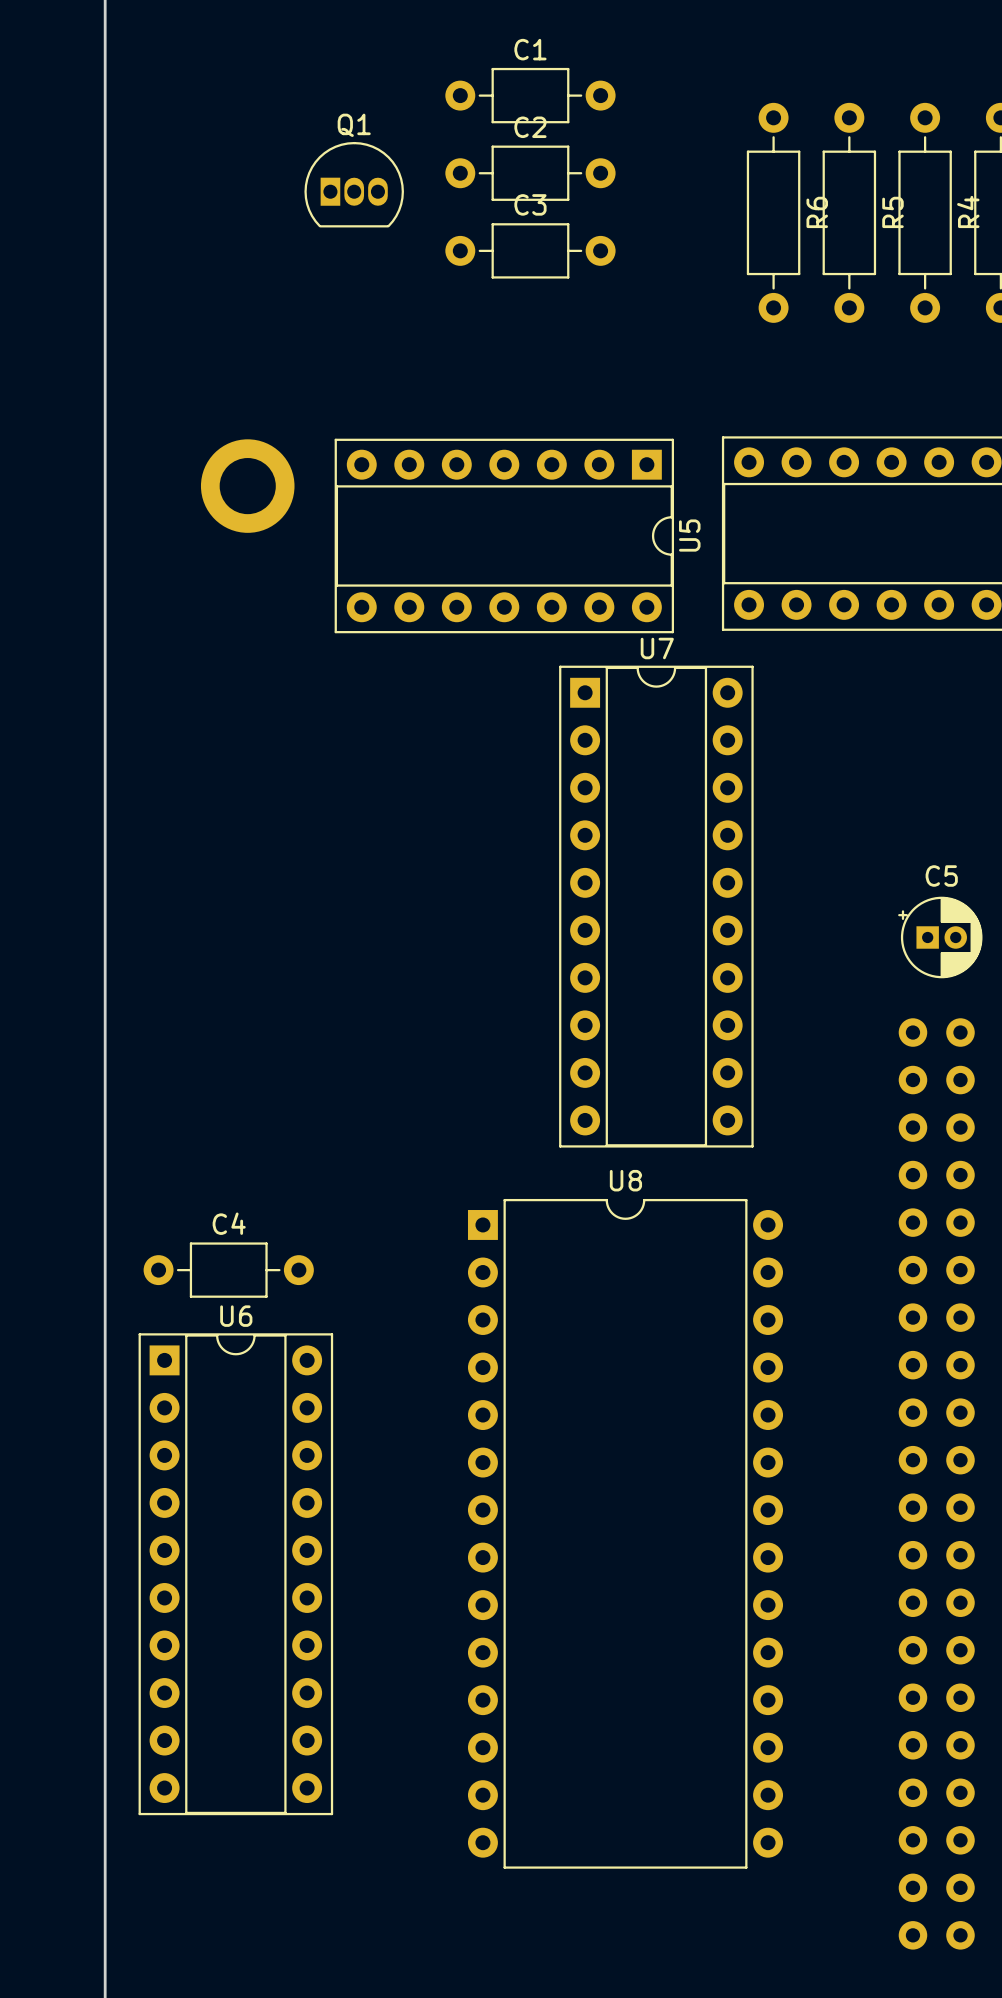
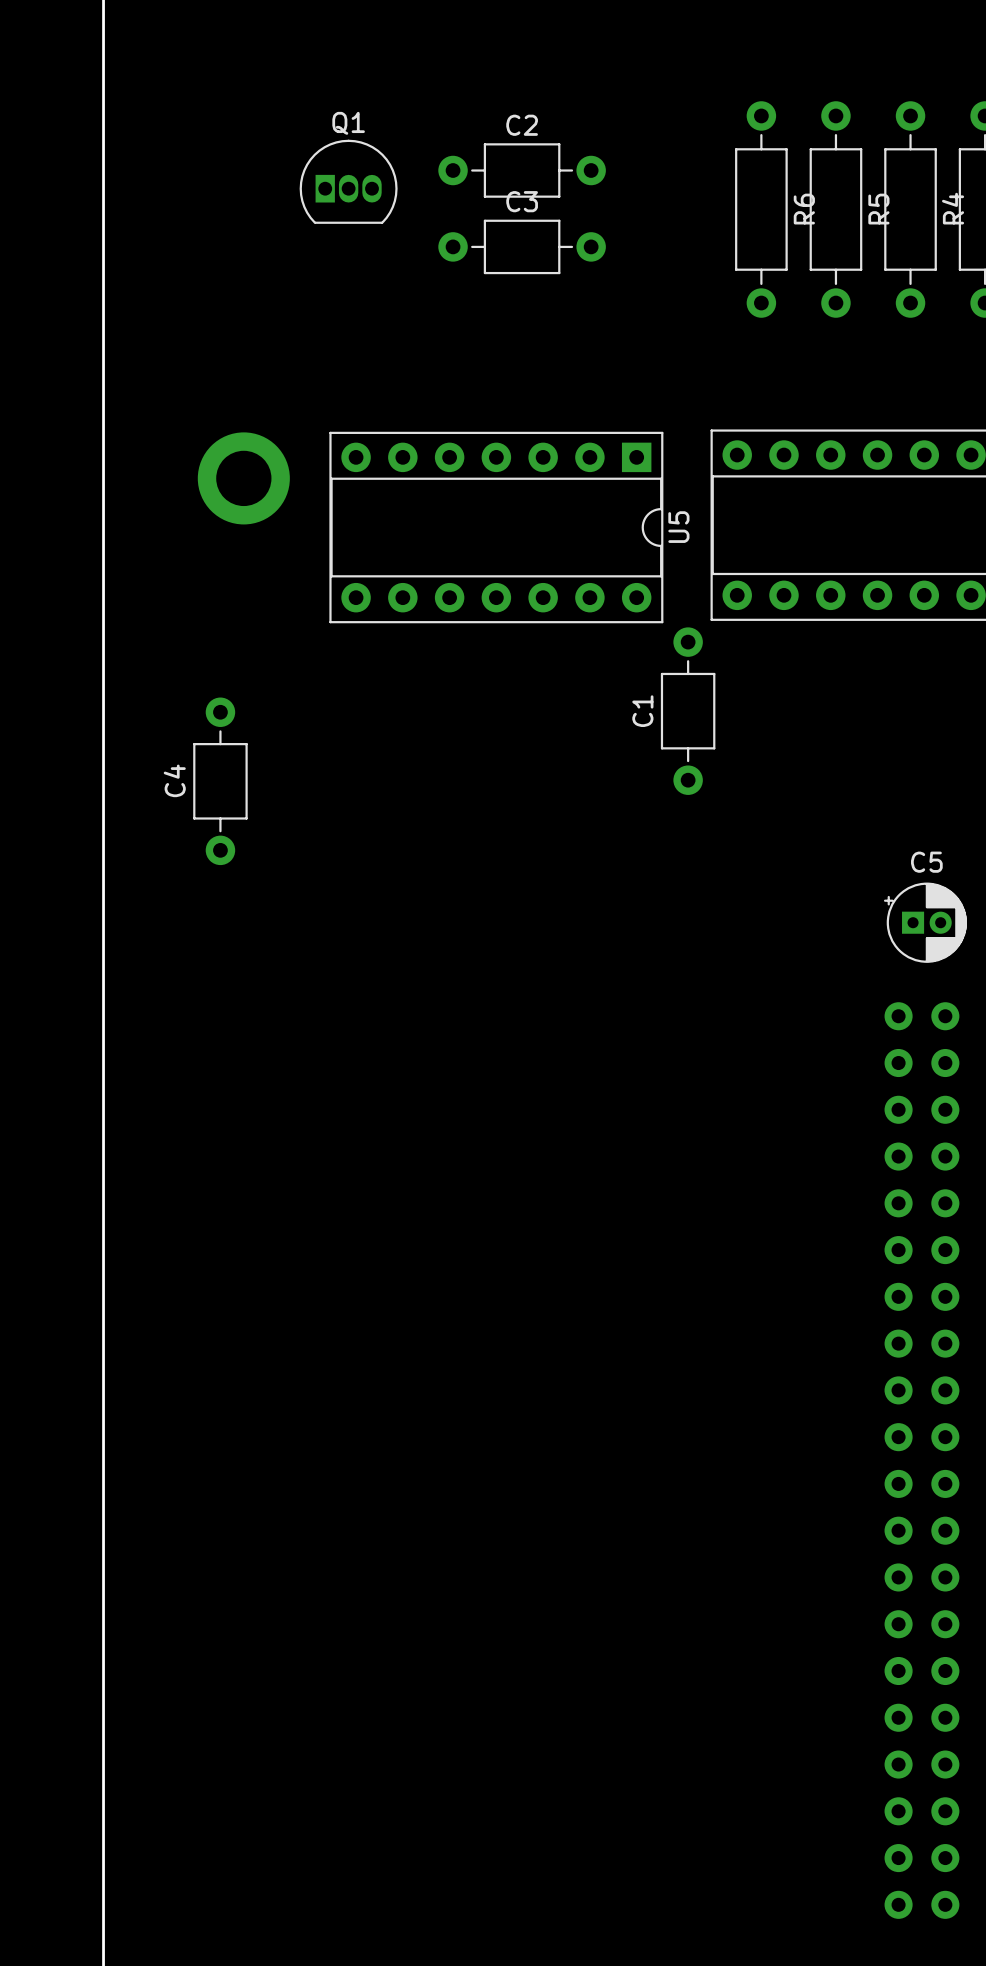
C1 name position: C1 (530, 49) -> C1 (642, 711)
C1 rotation: 0° (530, 95) -> 90° clockwise (688, 711)
C1 position: (530, 95) -> (688, 711)
U7: (656, 906) -> none
C4 name position: C4 (229, 1223) -> C4 (174, 780)
C4 rotation: 0° (228, 1270) -> 90° clockwise (220, 781)
C4 position: (228, 1270) -> (220, 781)
U8: (625, 1533) -> none
U6: (235, 1574) -> none

